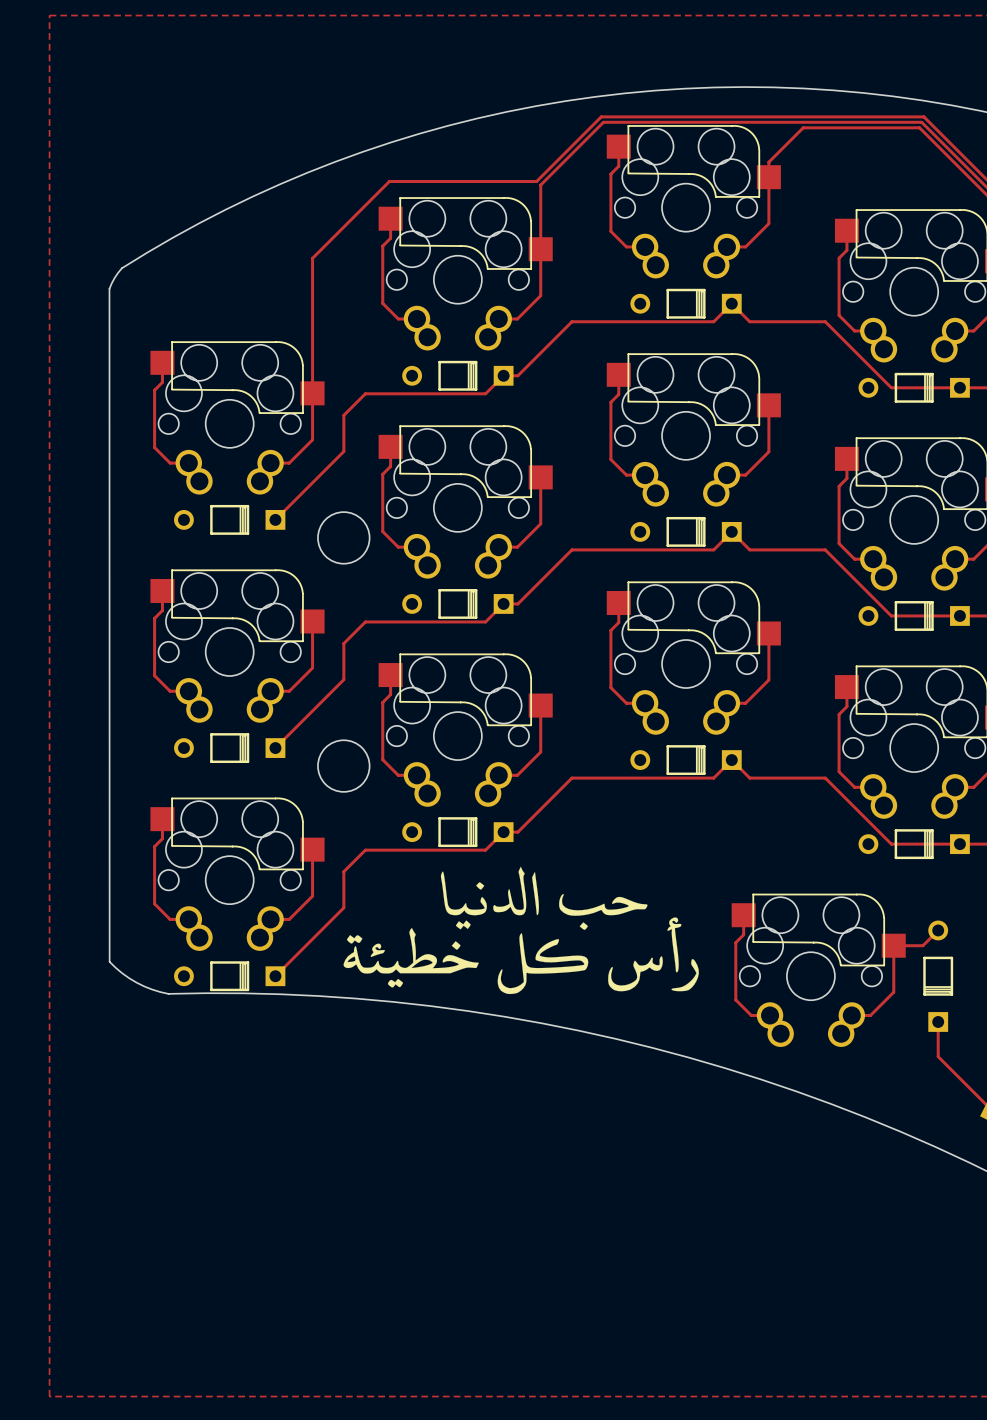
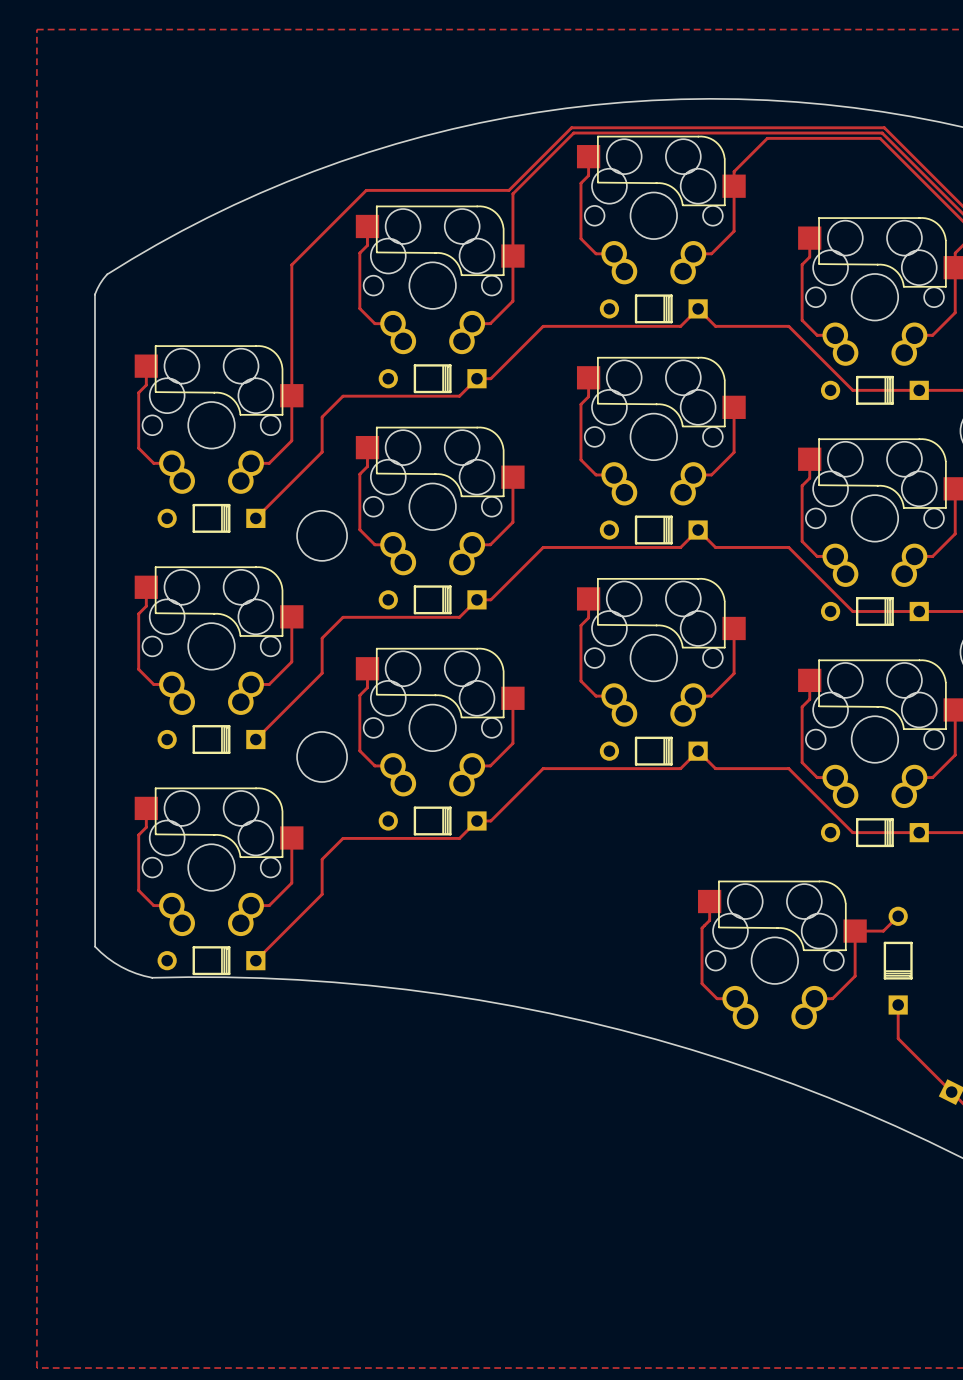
drawing: [343, 866, 699, 995] -> none

